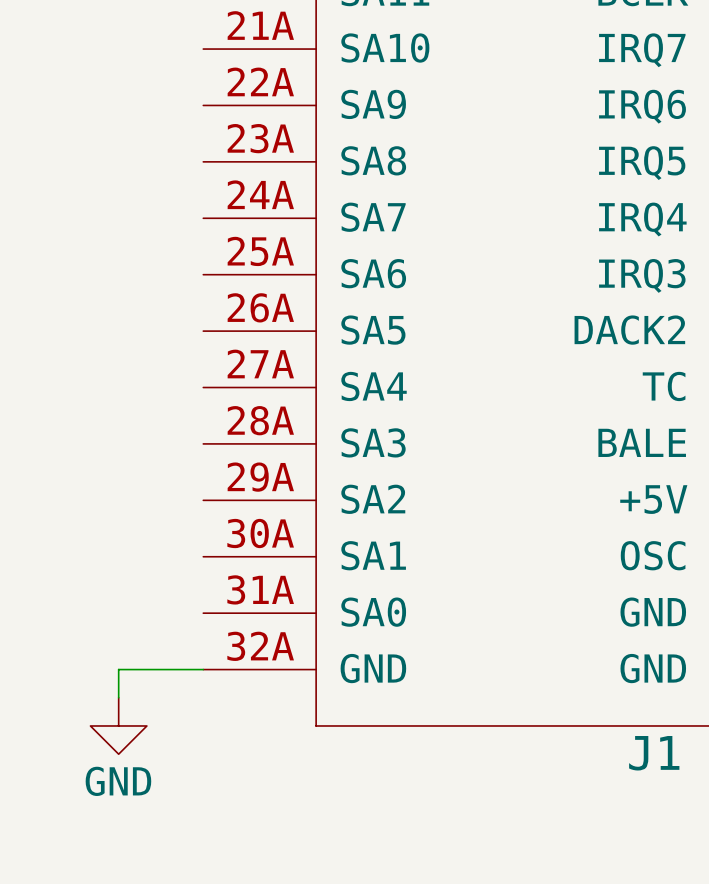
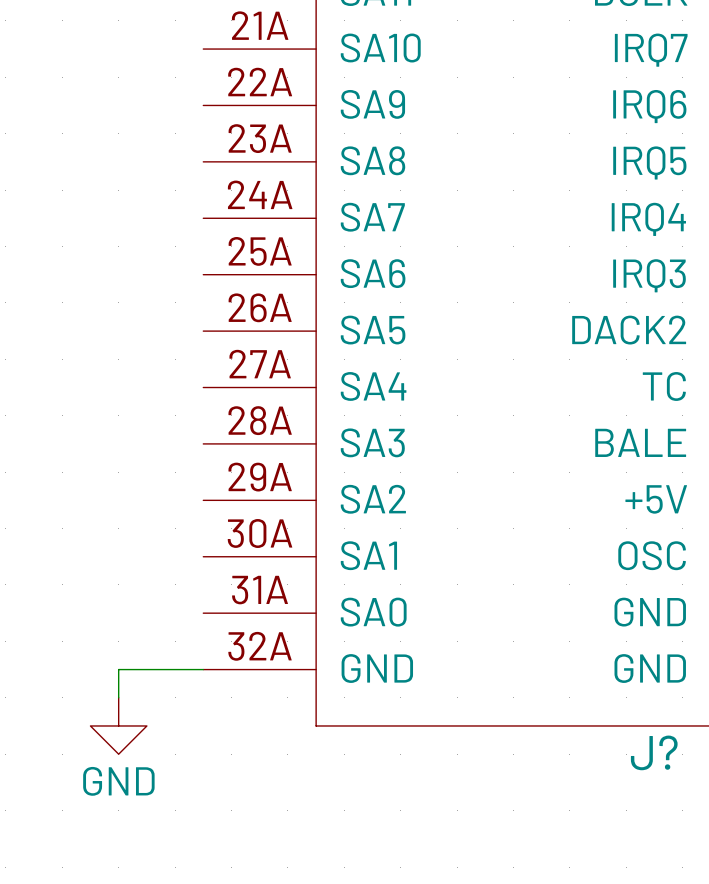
J1 name: J1 (654, 753) -> J? (654, 752)

